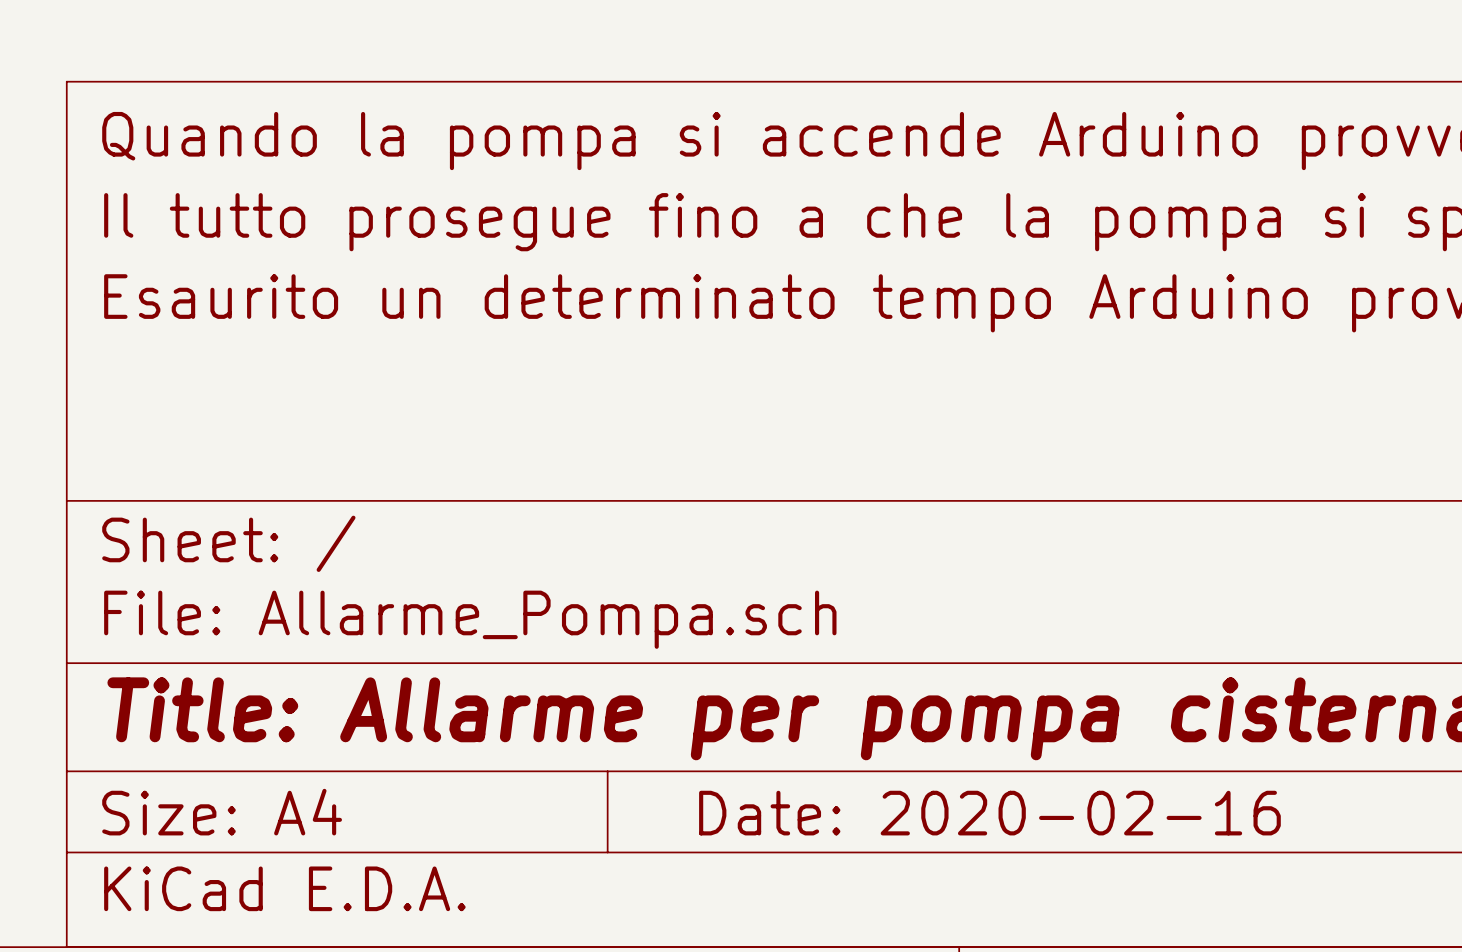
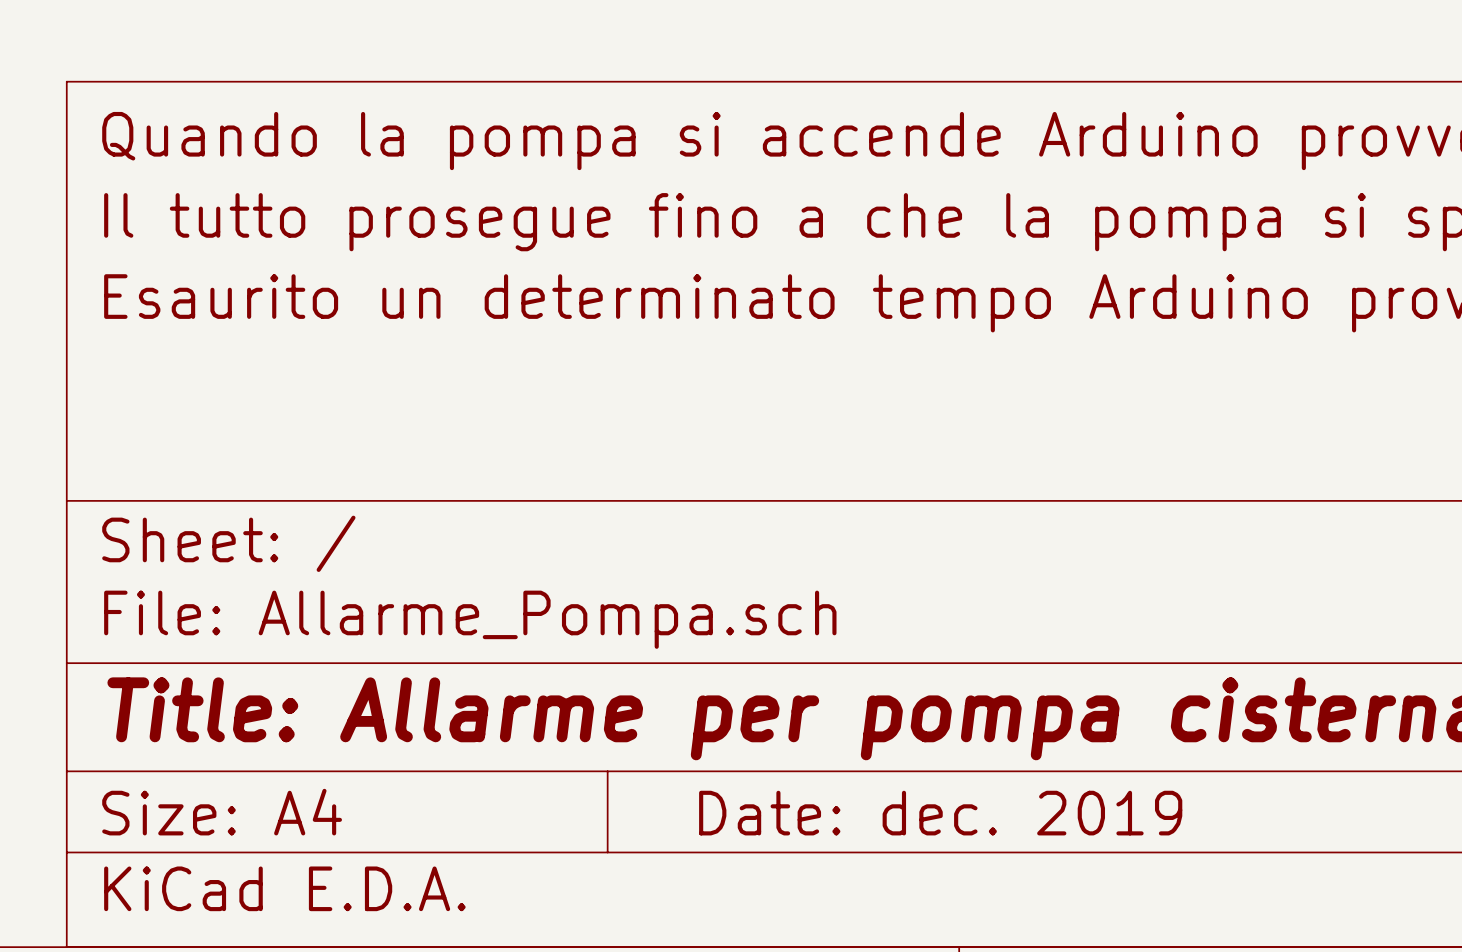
title block: Date: 2020-02-16 (989, 813) -> Date: dec. 2019 (940, 813)

